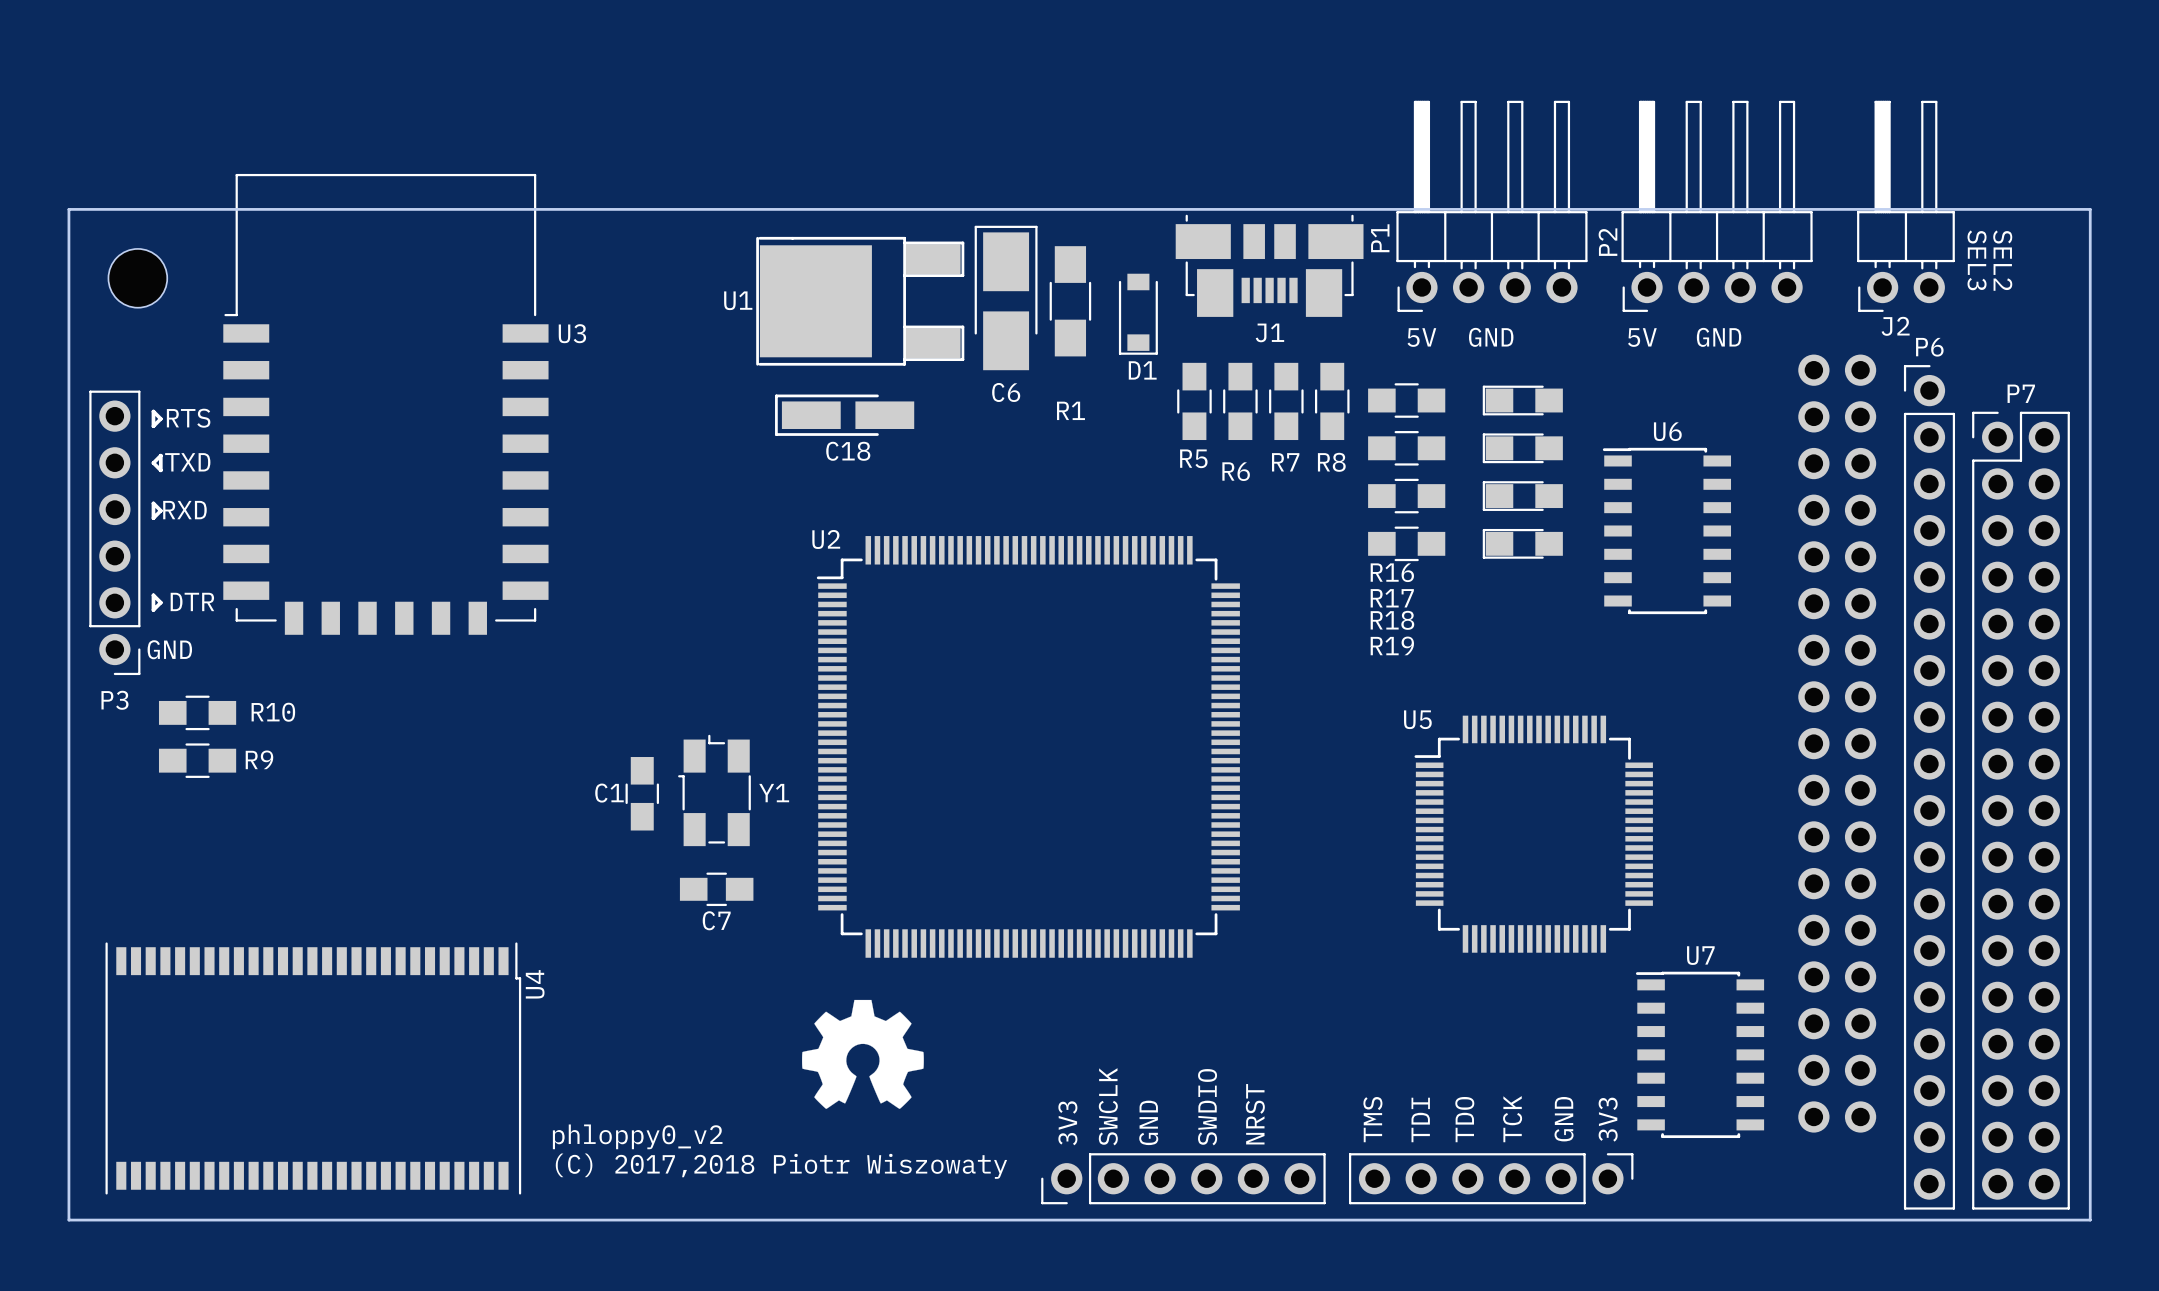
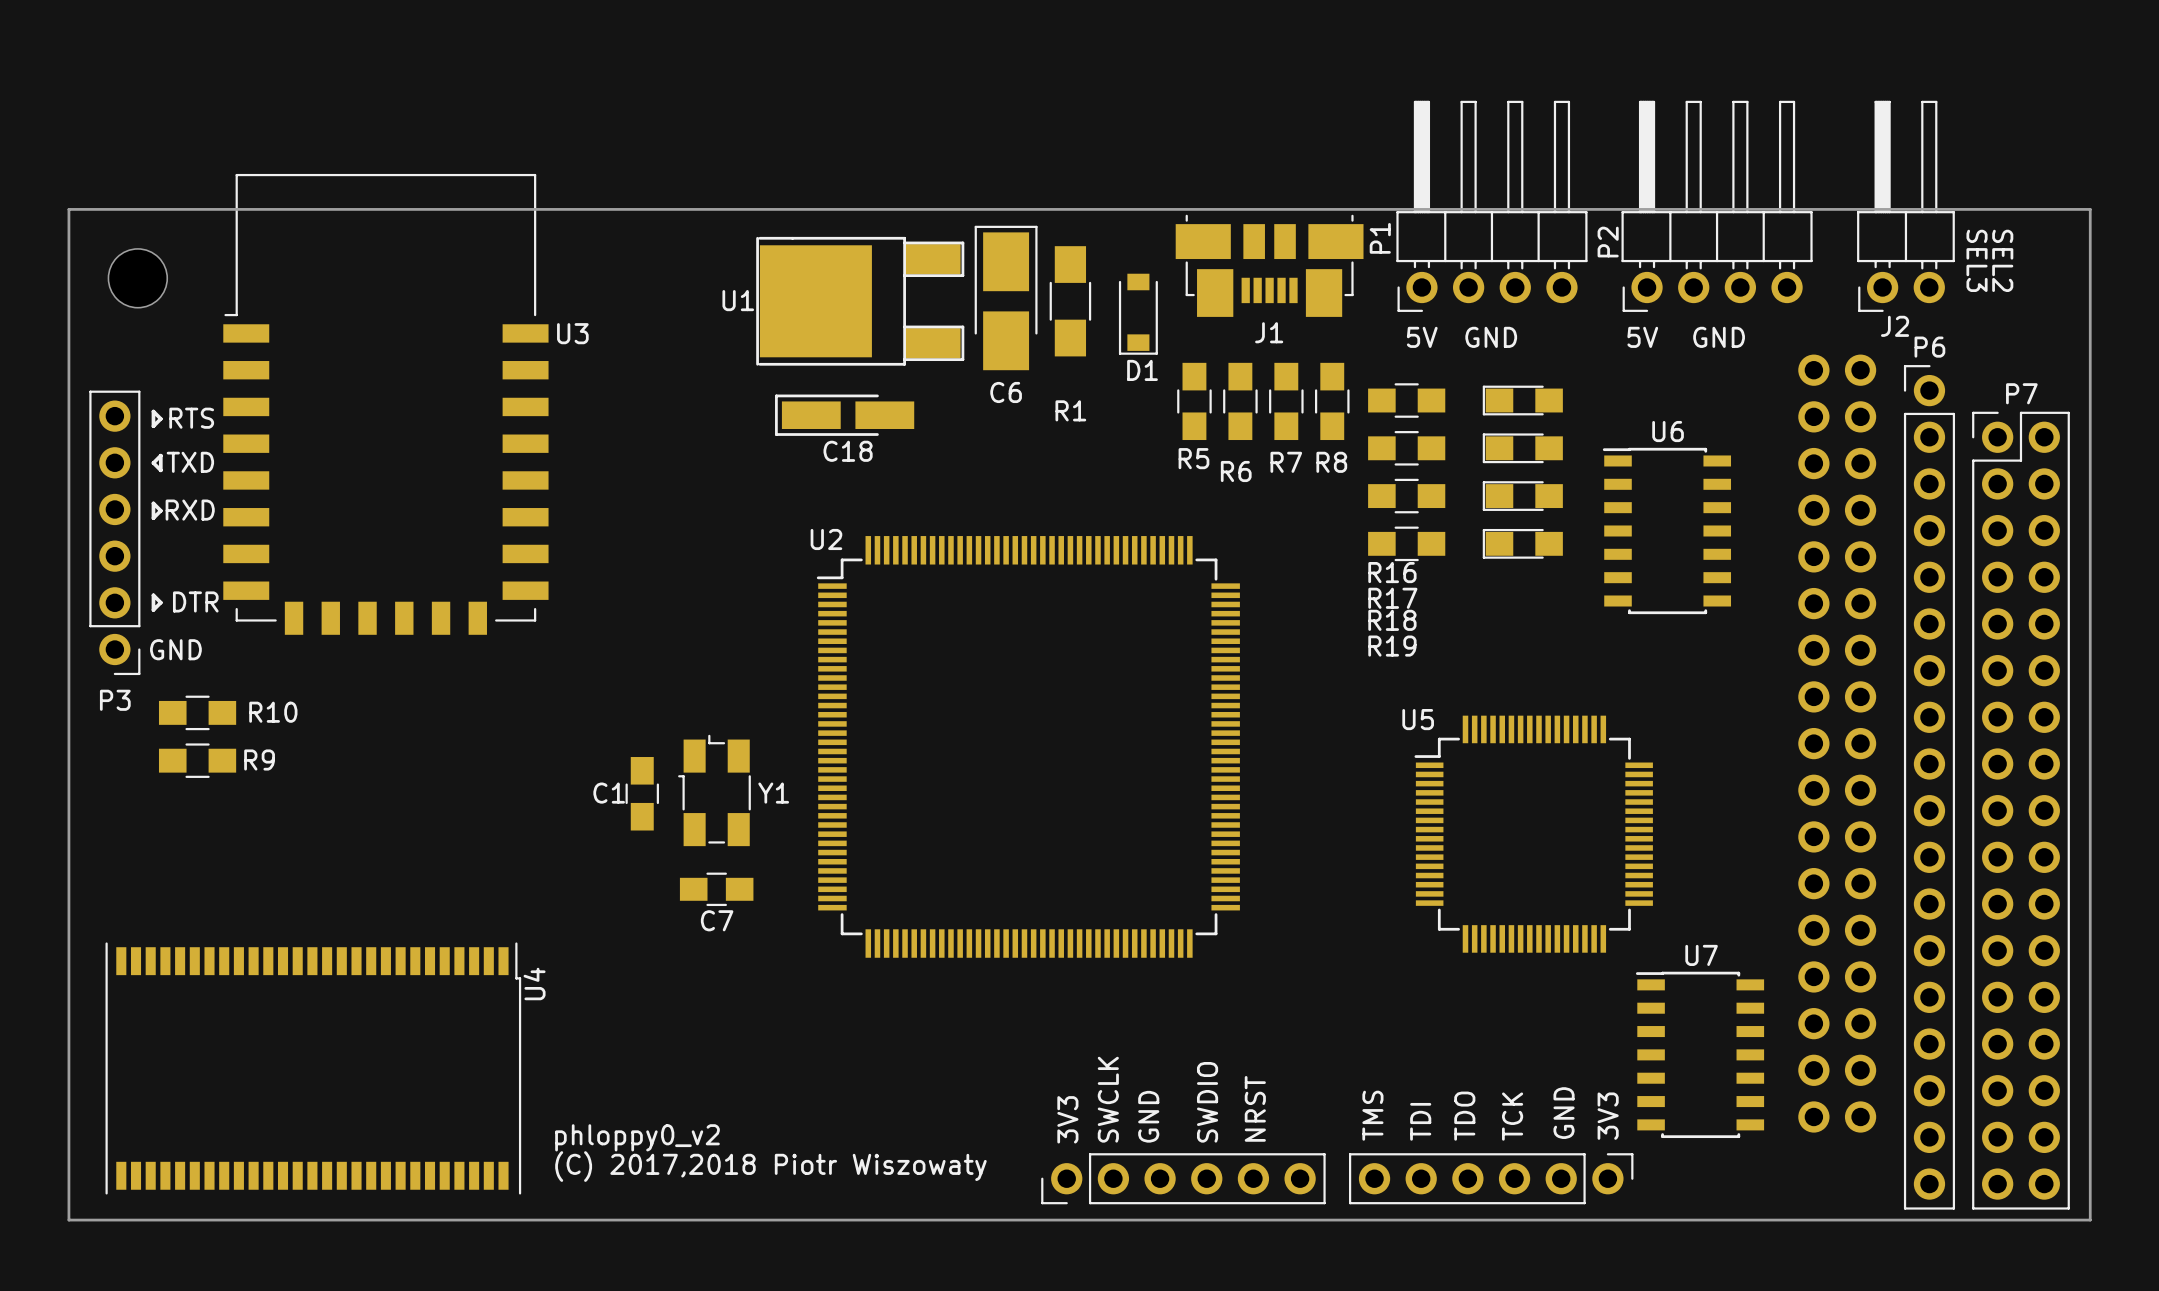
drawing: [802, 999, 924, 1109] -> none

